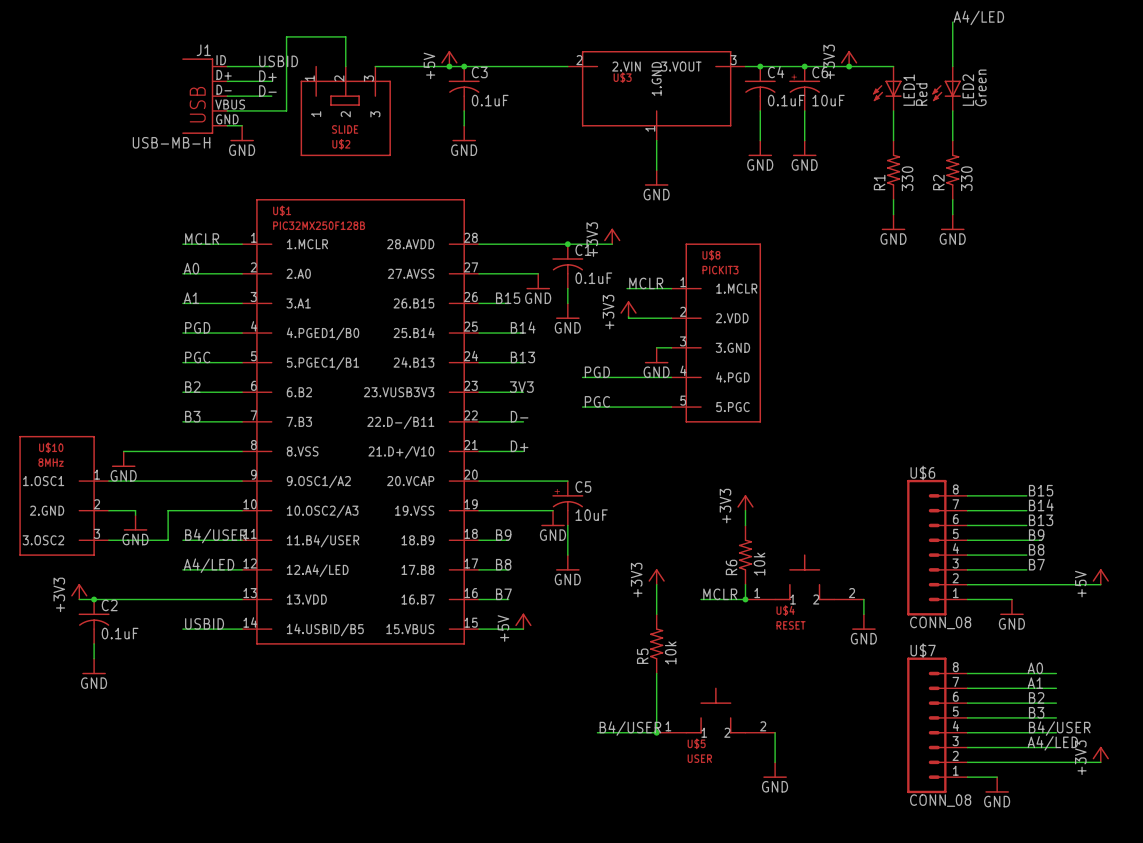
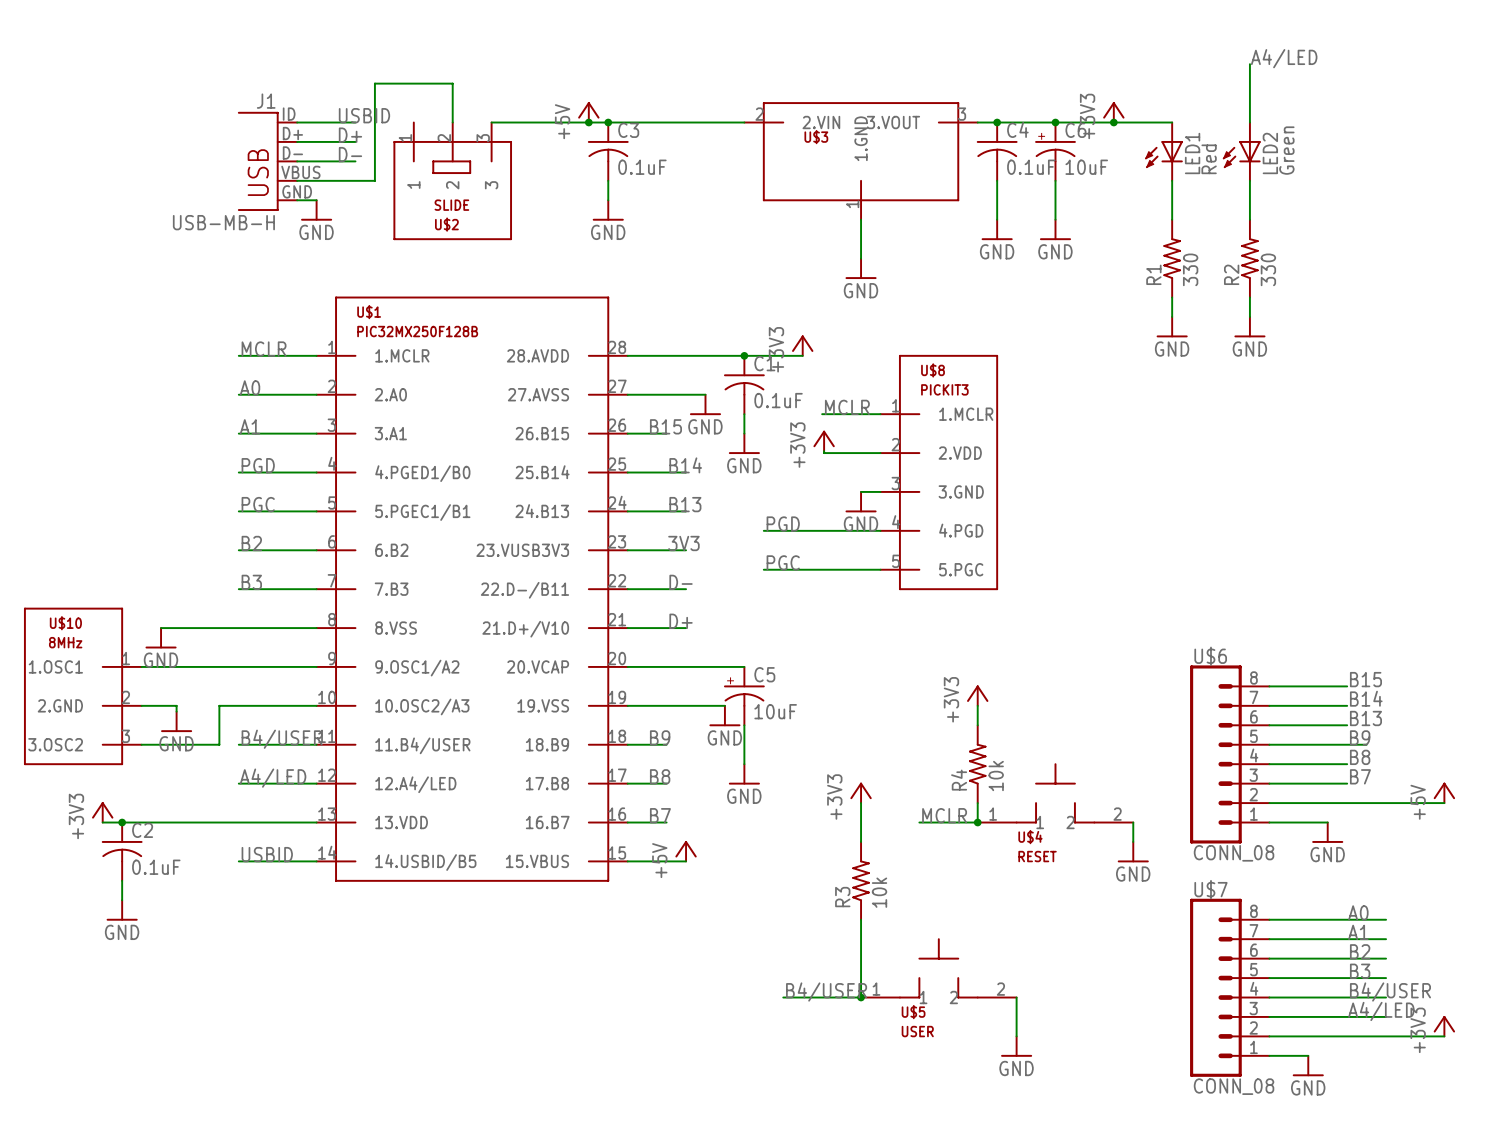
R6 name: R6 (731, 567) -> R4 (959, 780)
R5 name: R5 (642, 656) -> R3 (842, 897)

